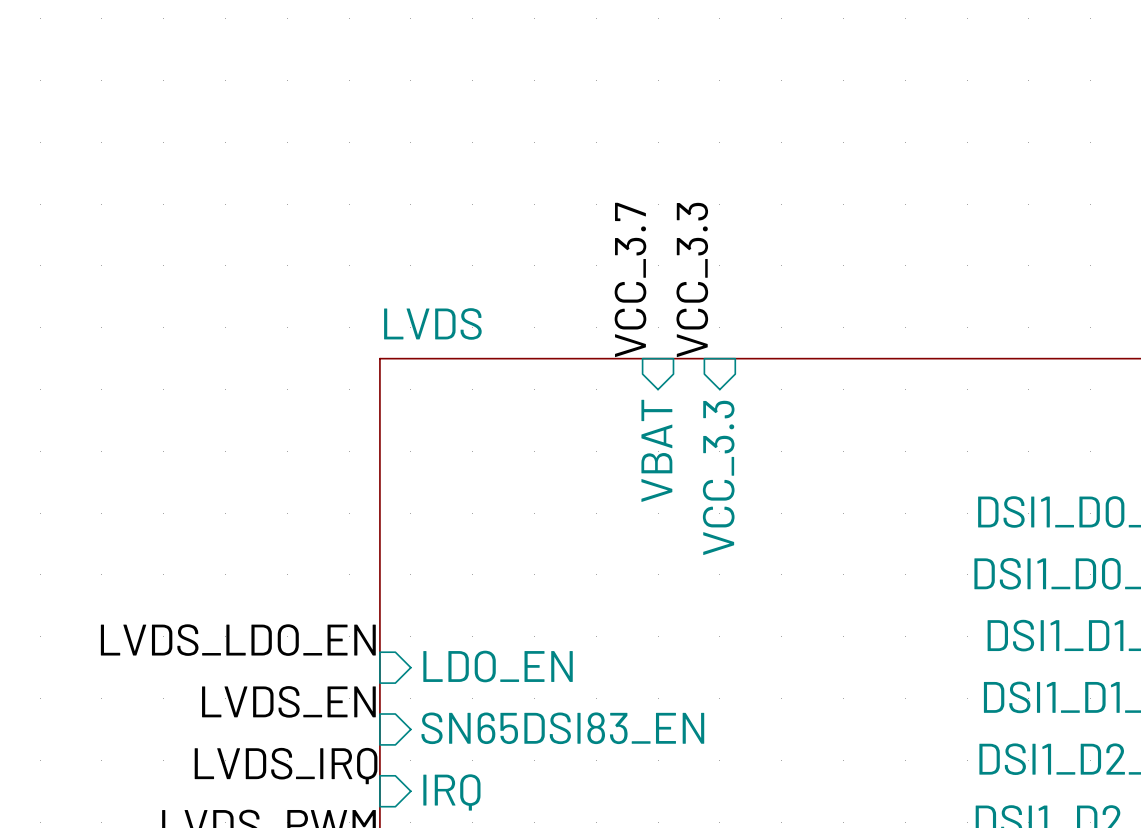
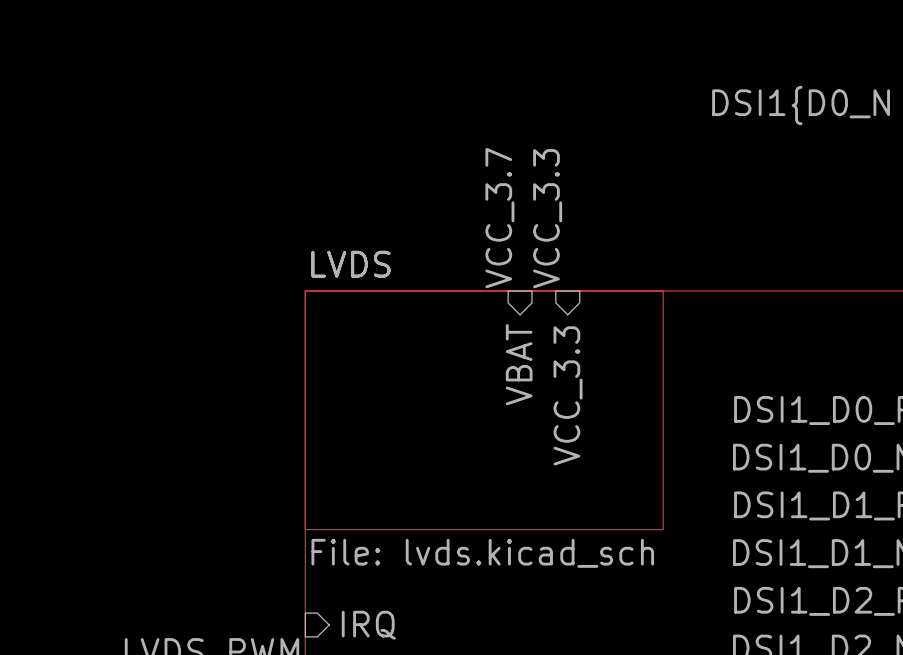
sheet LVDS: none -> File: lvds.kicad_sch (484, 410)
label: LVDS_LDO_EN (238, 640) -> none
sheet pin: LDO_EN (498, 666) -> none
label: LVDS_EN (288, 701) -> none
sheet pin: SN65DSI83_EN (562, 728) -> none
label: LVDS_IRQ (286, 766) -> none

